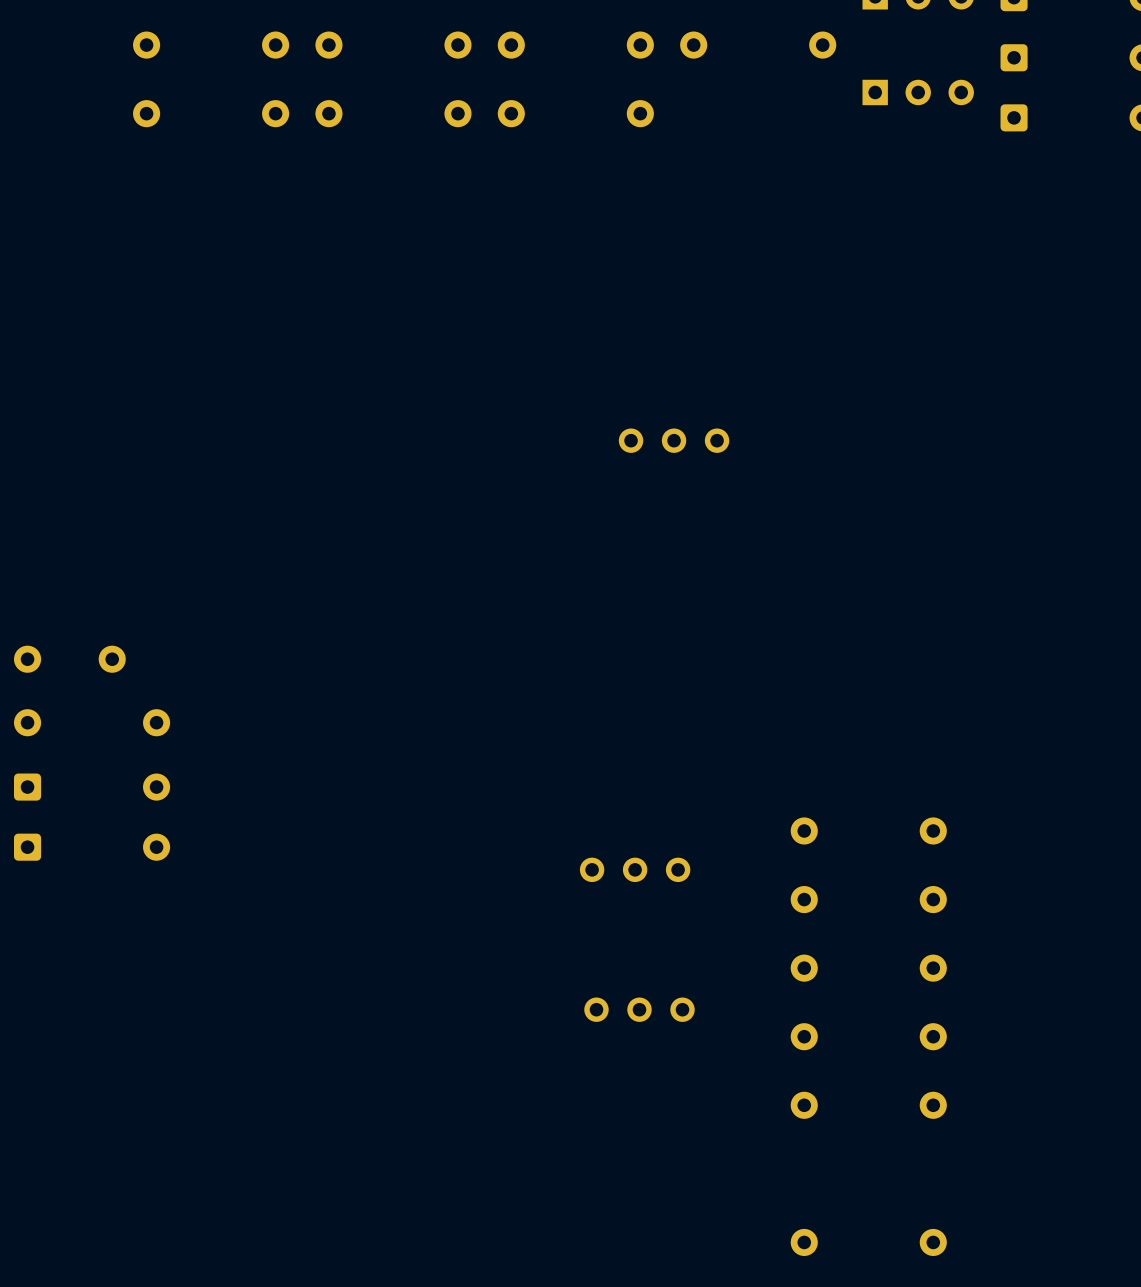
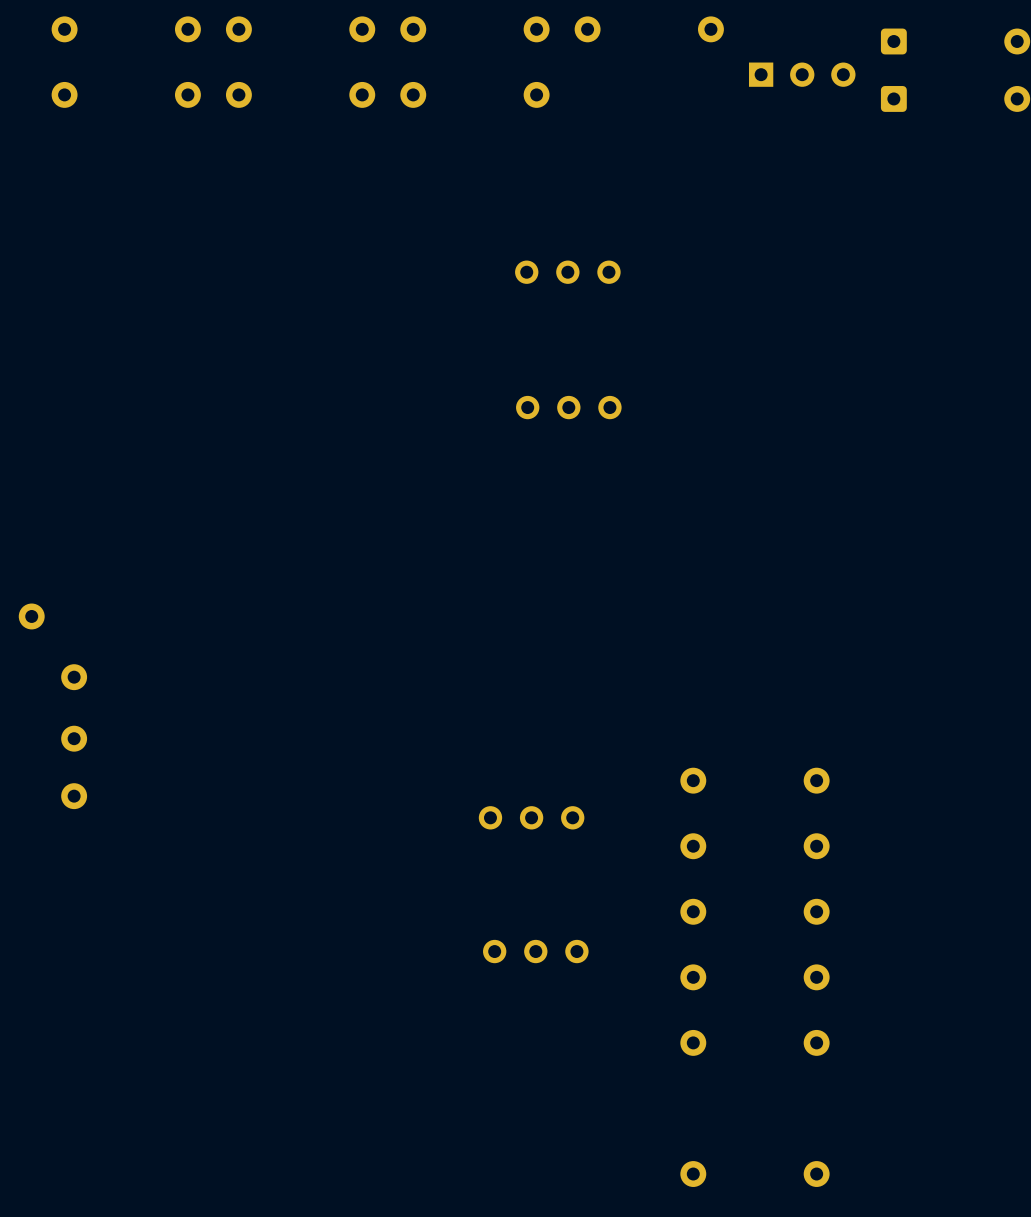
part: none -> (567, 272)

